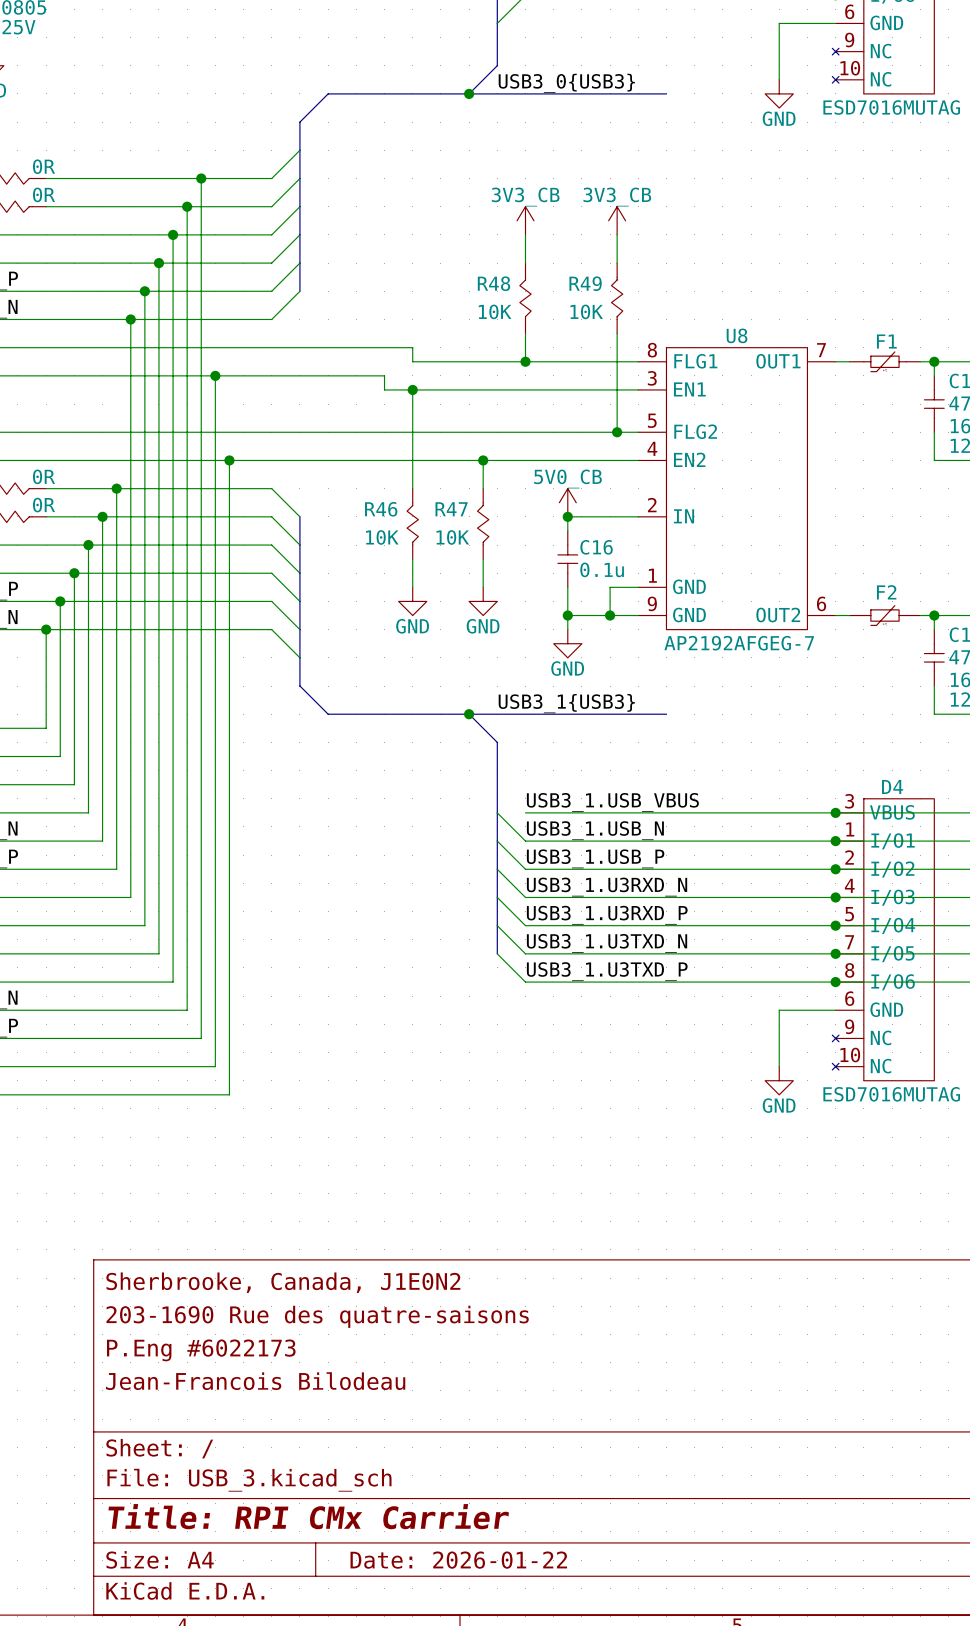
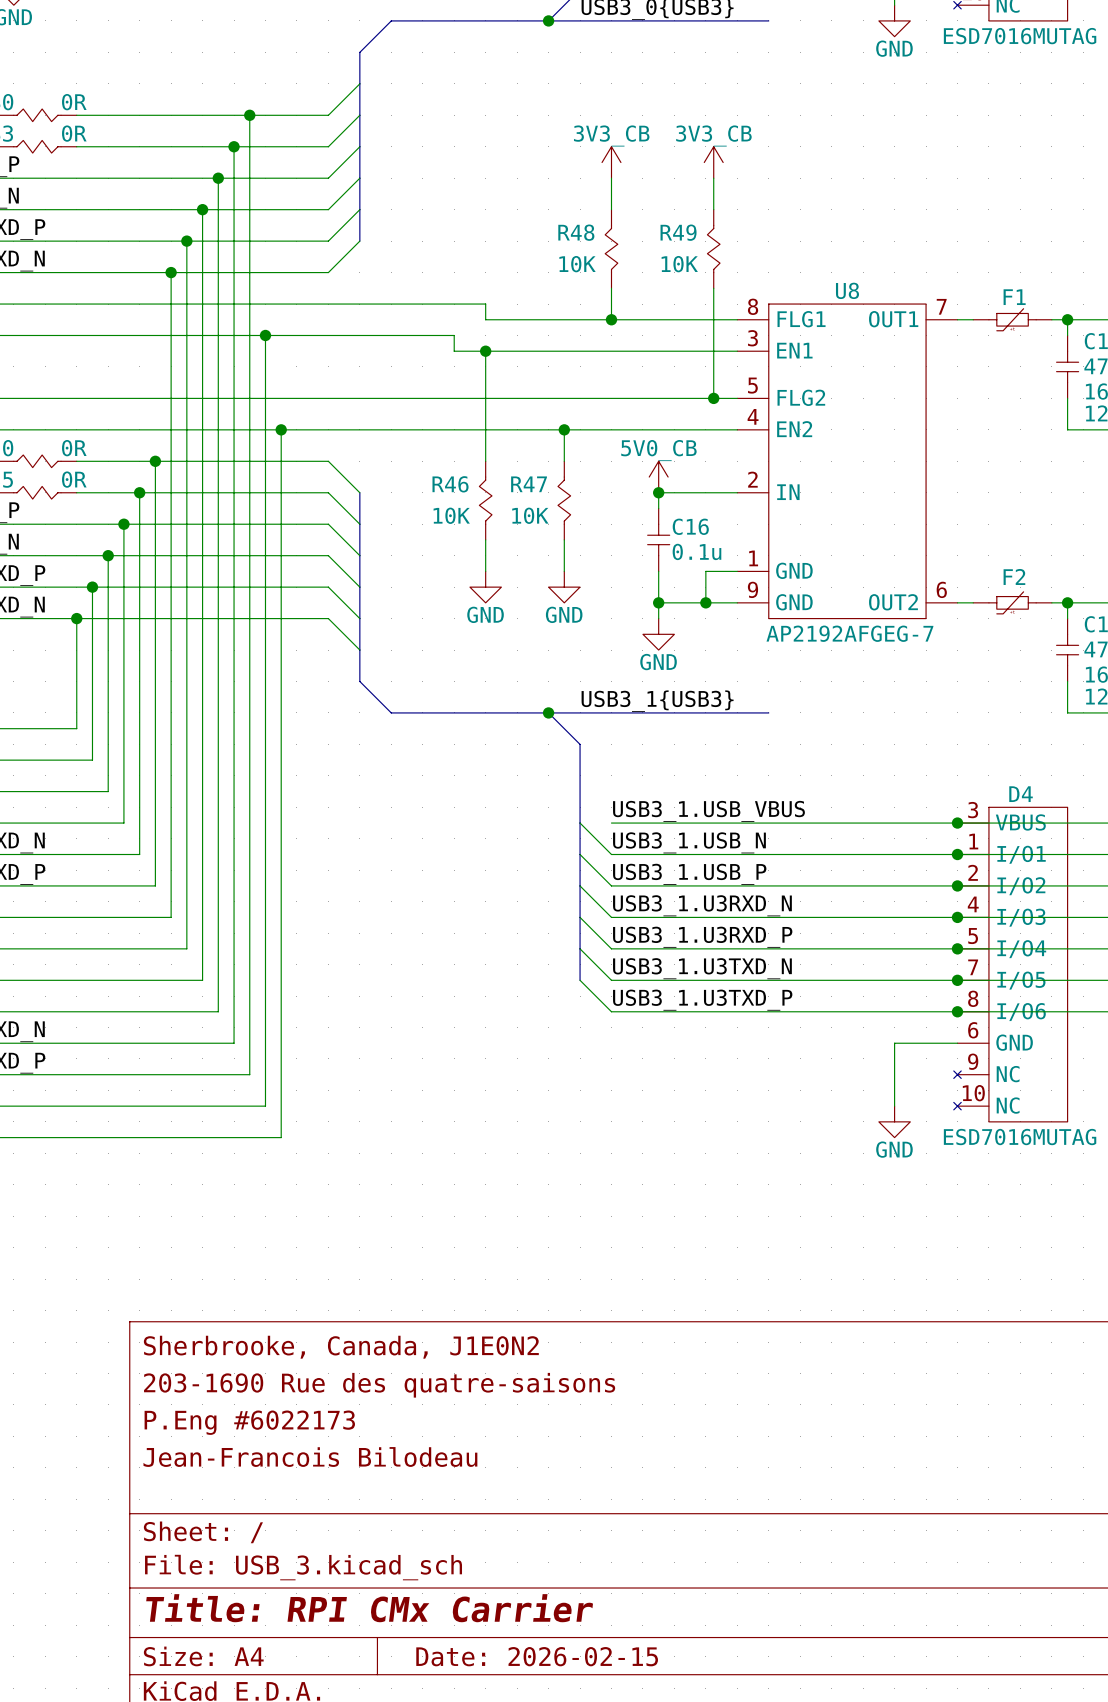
title block: Date: 2026-01-22 (458, 1560) -> Date: 2026-02-15 (537, 1656)

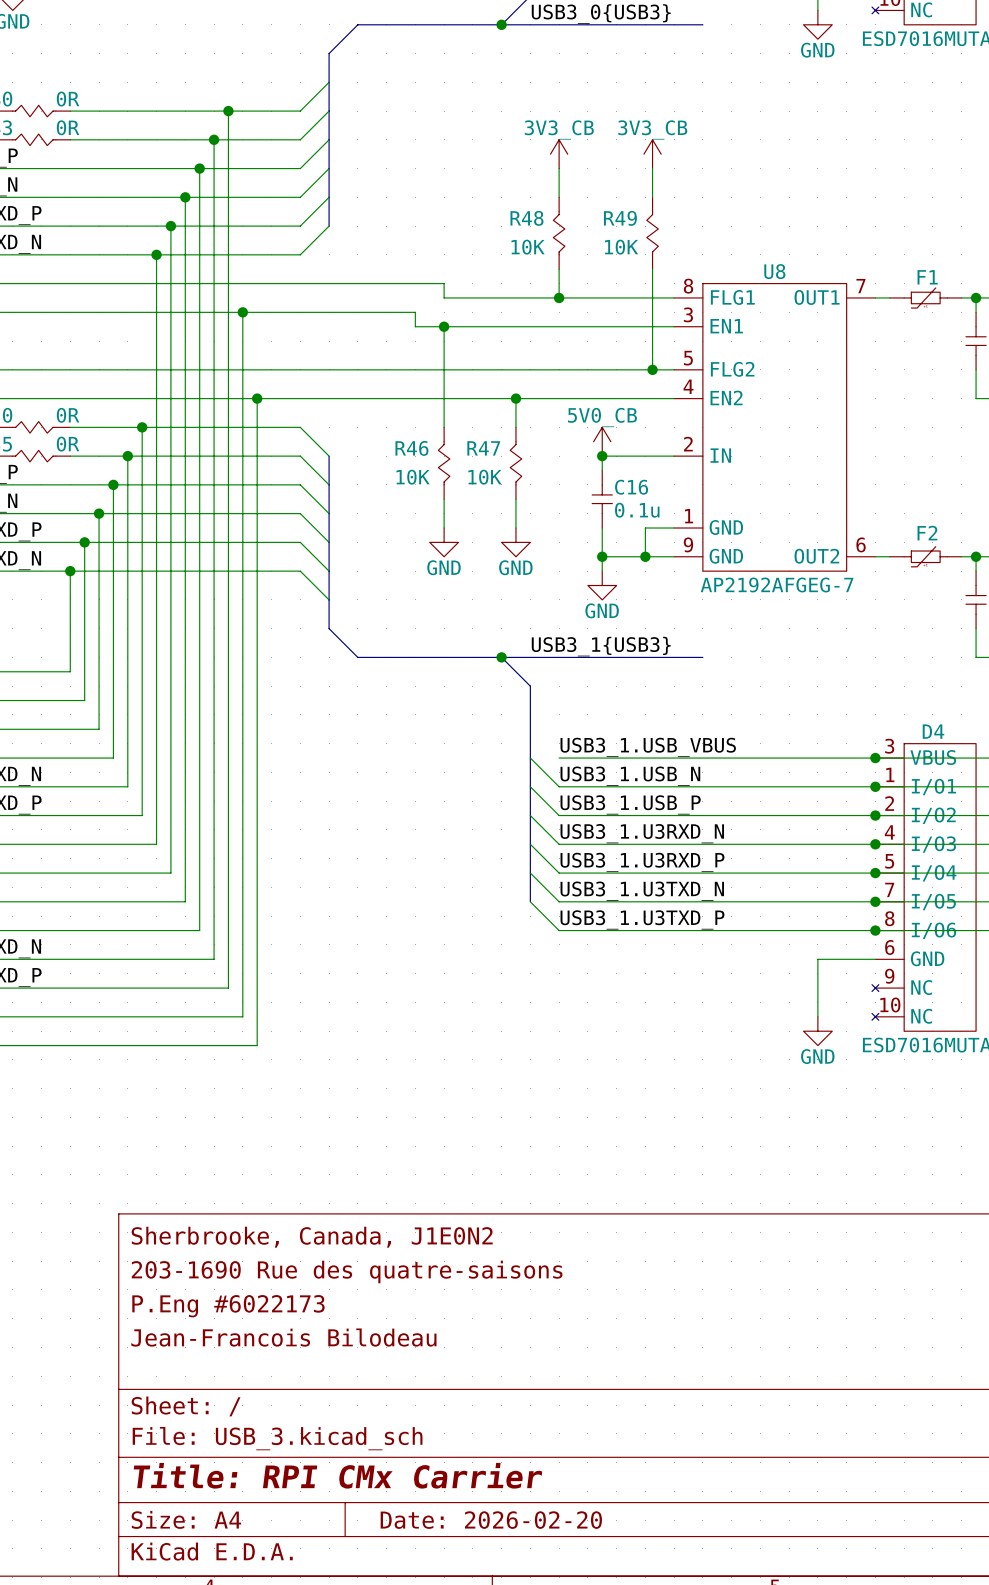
title block: Date: 2026-02-15 (537, 1656) -> Date: 2026-02-20 (491, 1520)

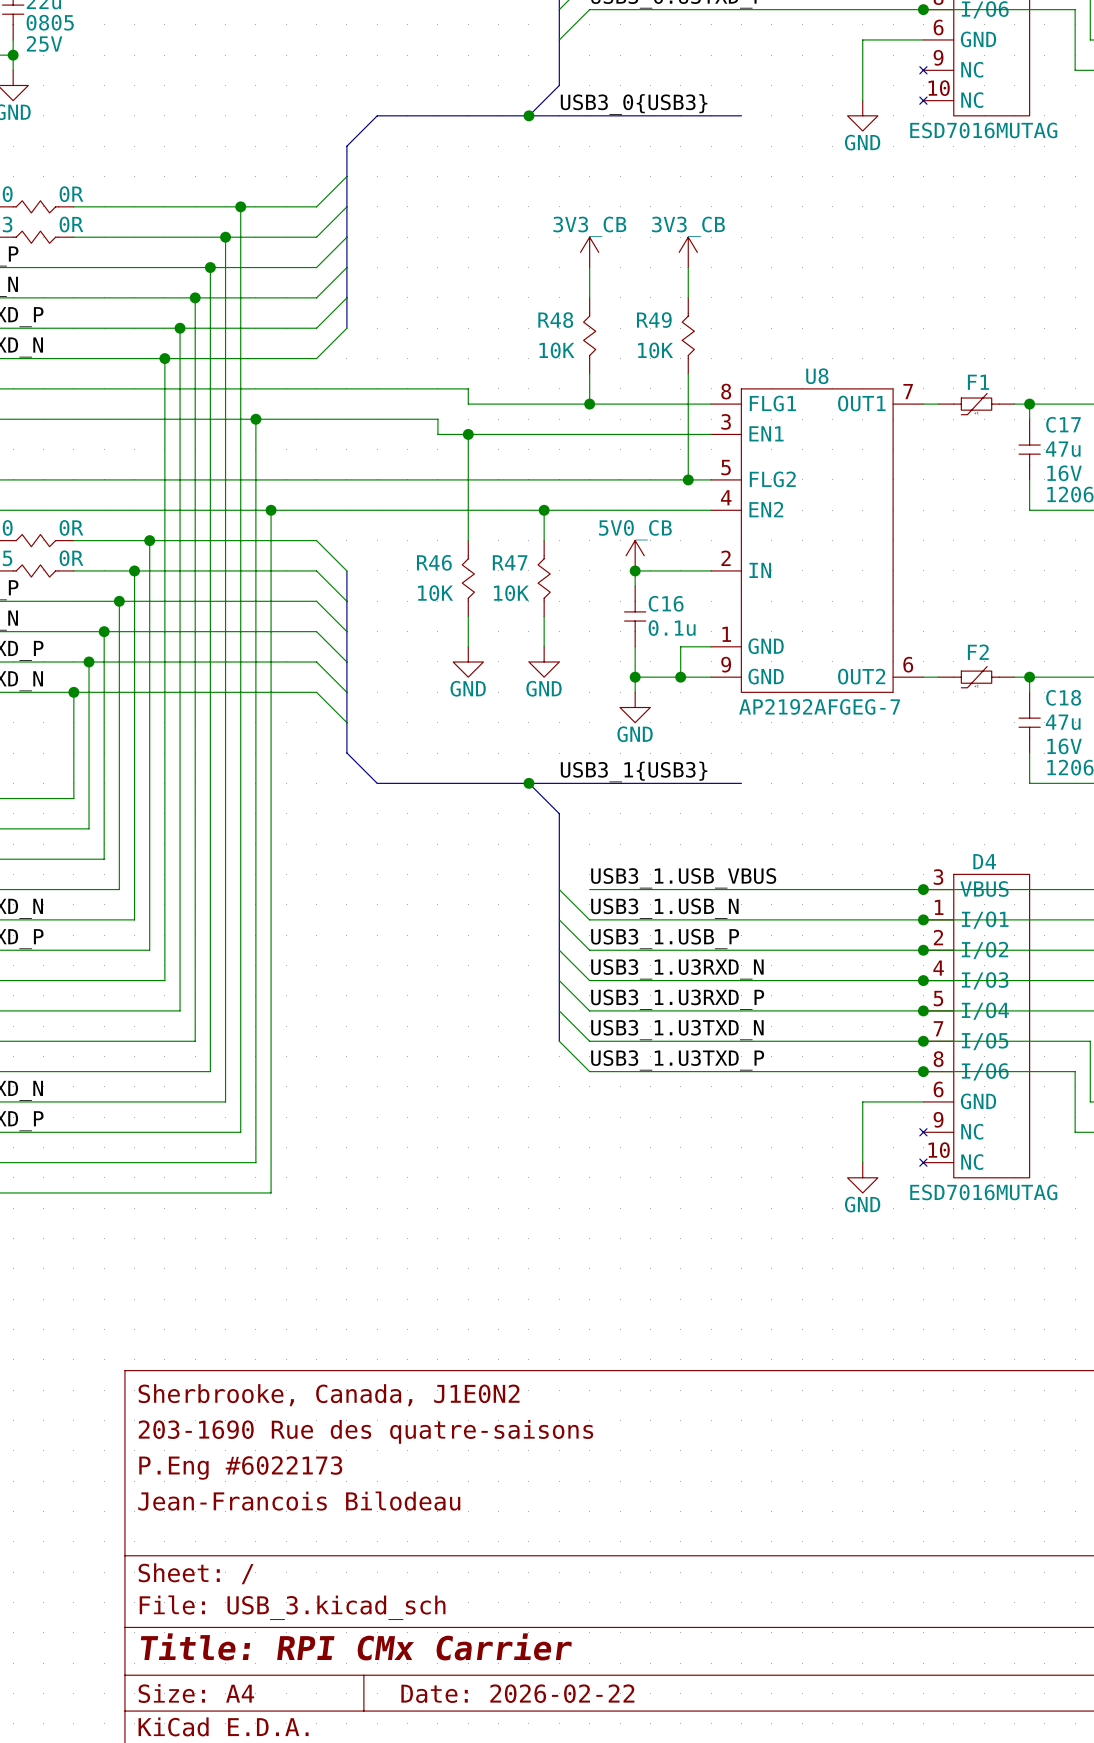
title block: Date: 2026-02-20 (491, 1520) -> Date: 2026-02-22 (517, 1693)

